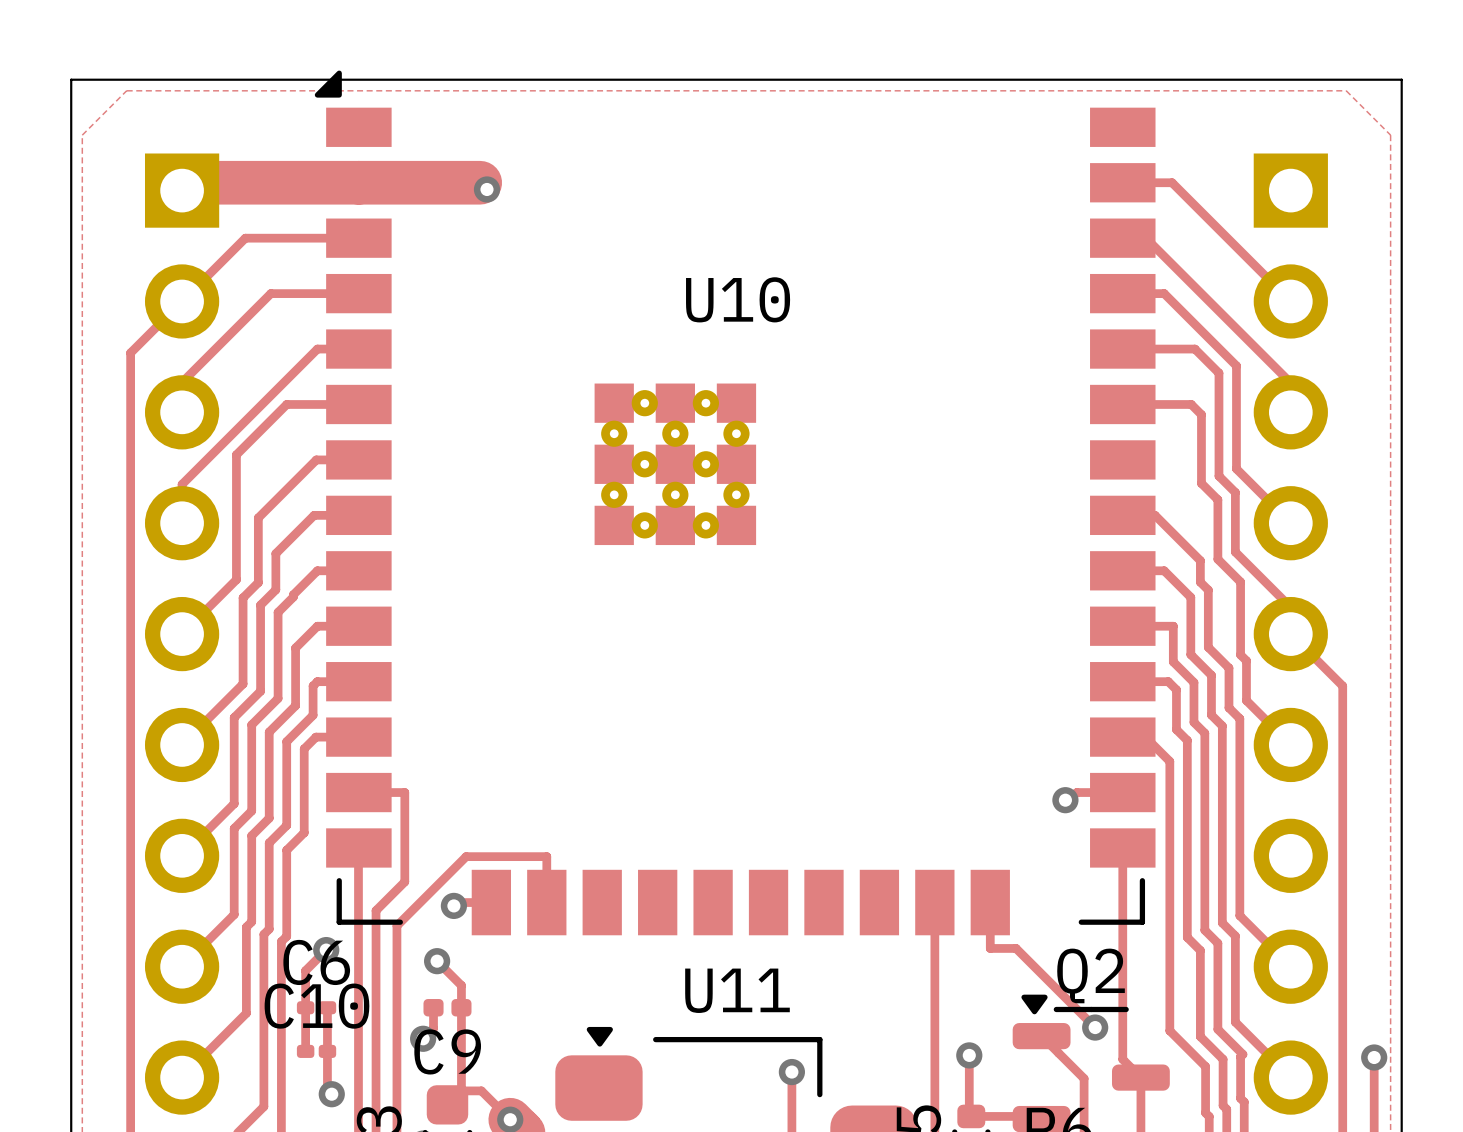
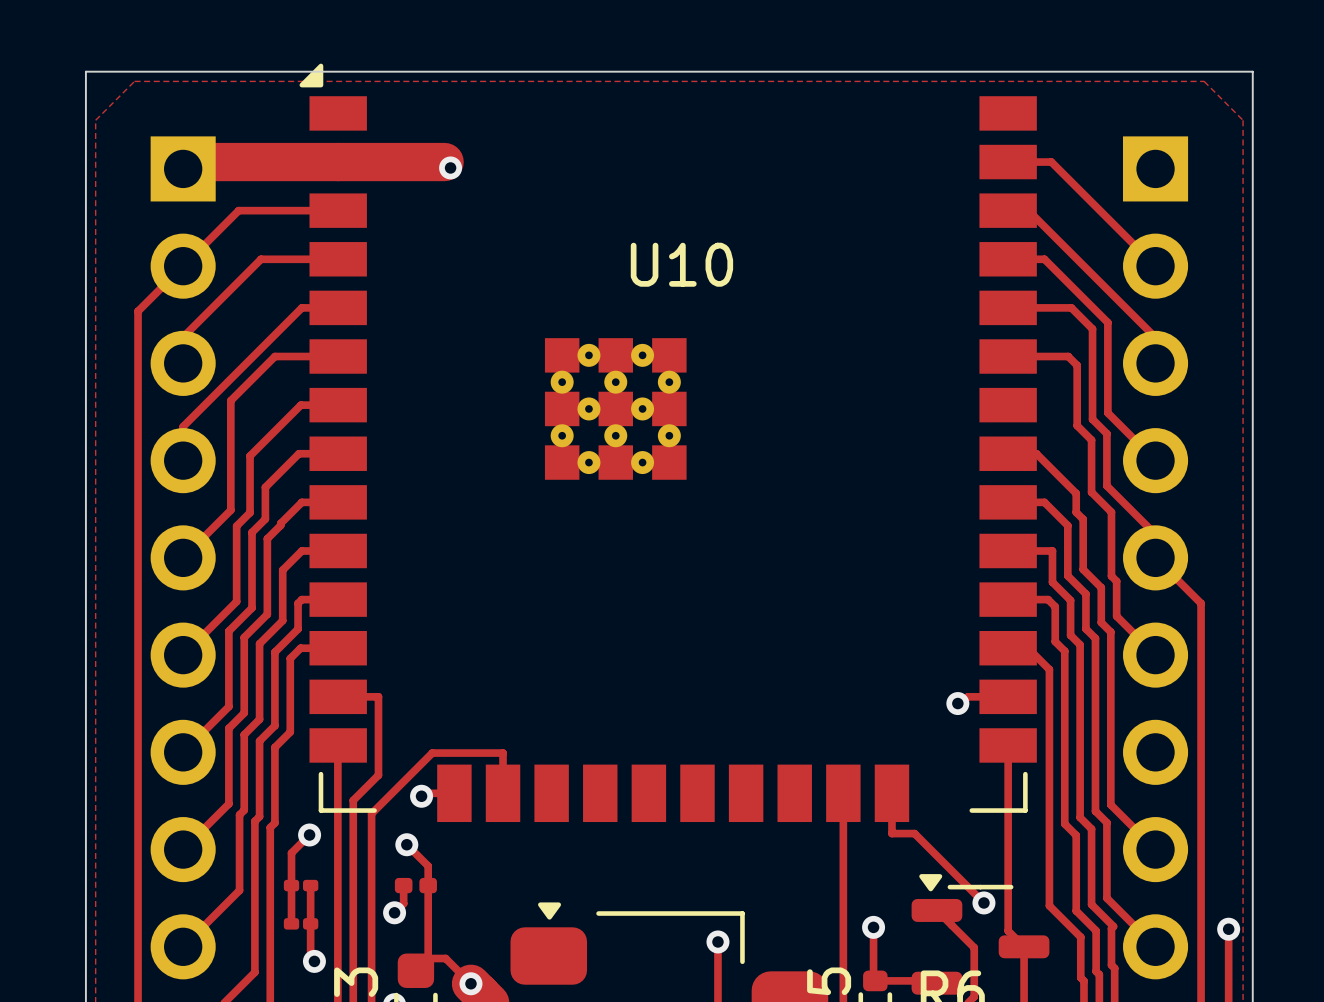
C6 name: C6 (316, 962) -> none
Q2 name: Q2 (1091, 975) -> none
U11 name: U11 (737, 990) -> none
C10 name: C10 (316, 1006) -> none
C9 name: C9 (447, 1051) -> none

